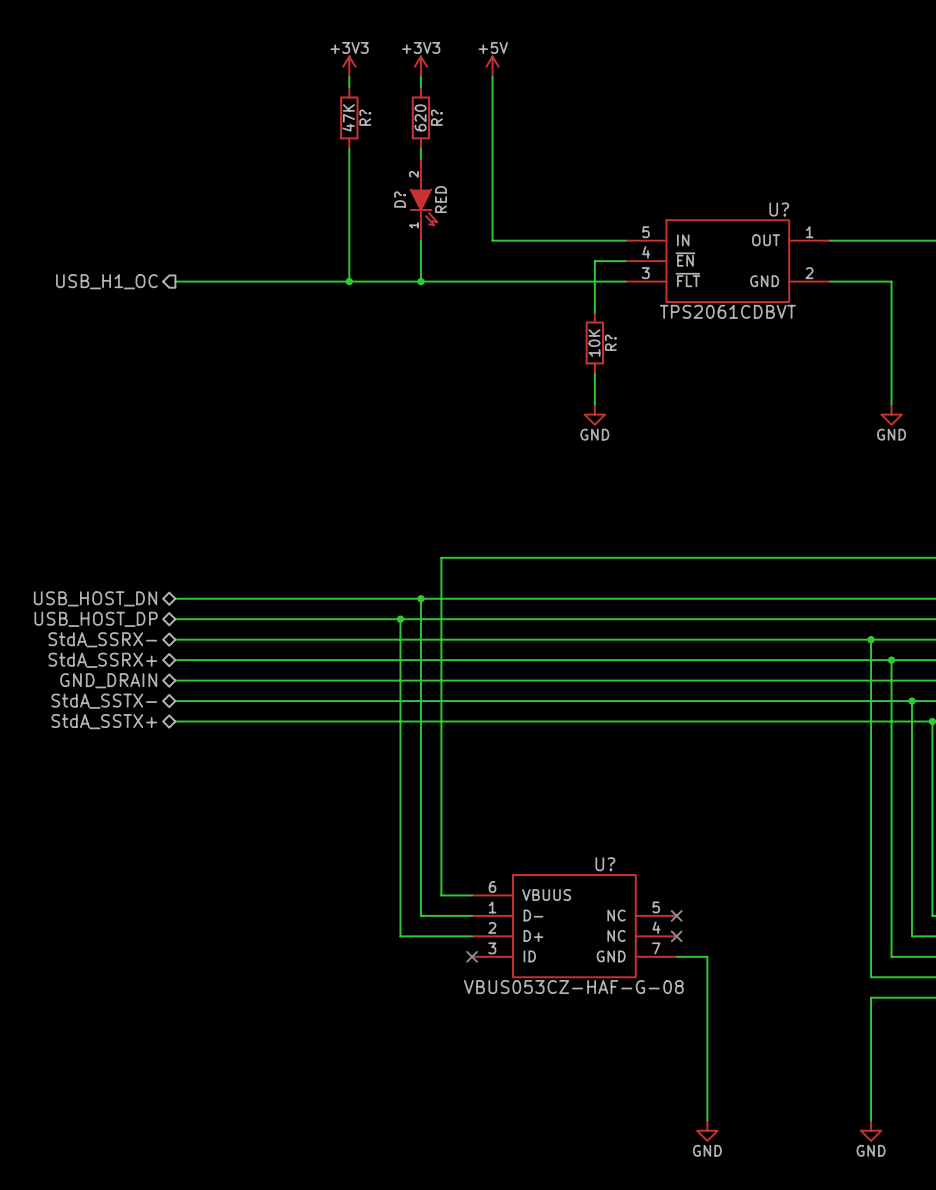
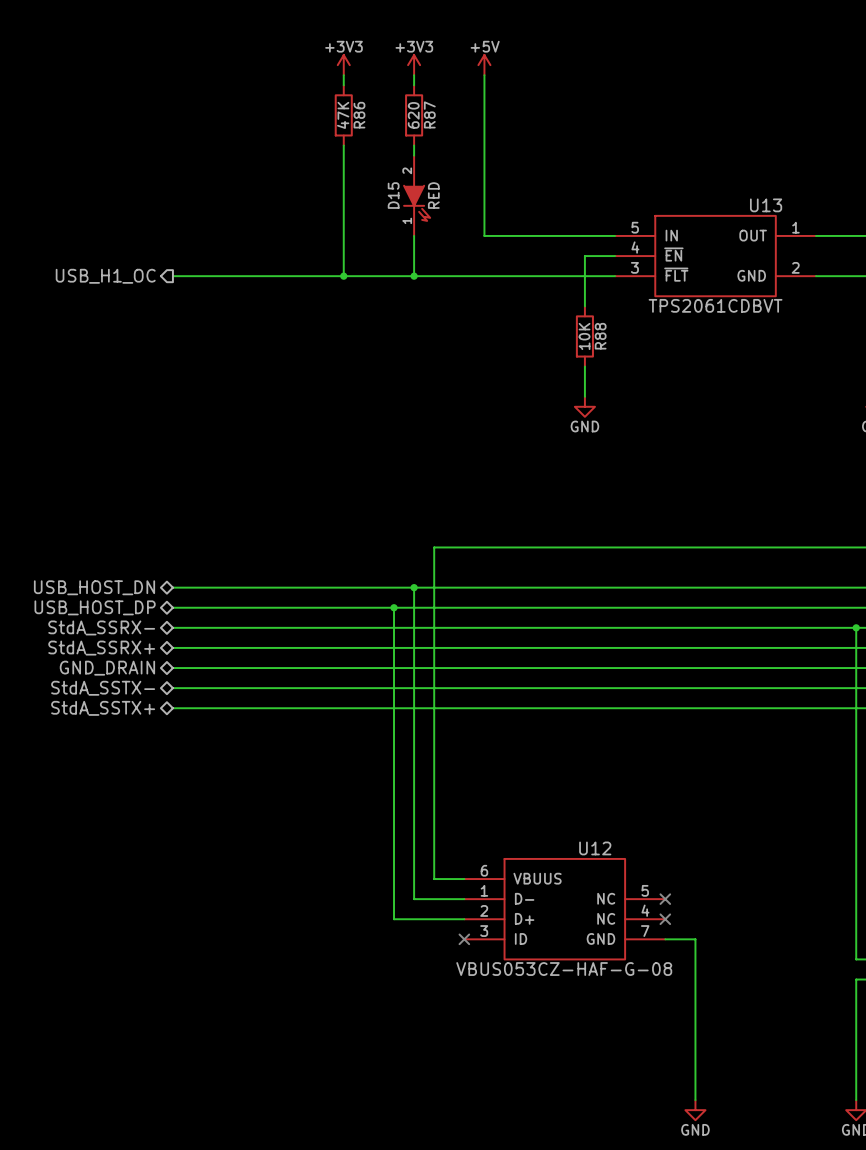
R? name: R? (365, 117) -> R86 (359, 115)
R? name: R? (436, 117) -> R87 (429, 114)
D? name: D? (400, 199) -> D15 (393, 195)
U? name: U? (779, 209) -> U13 (766, 205)
R? name: R? (610, 342) -> R88 (600, 336)
U? name: U? (605, 864) -> U12 (595, 848)

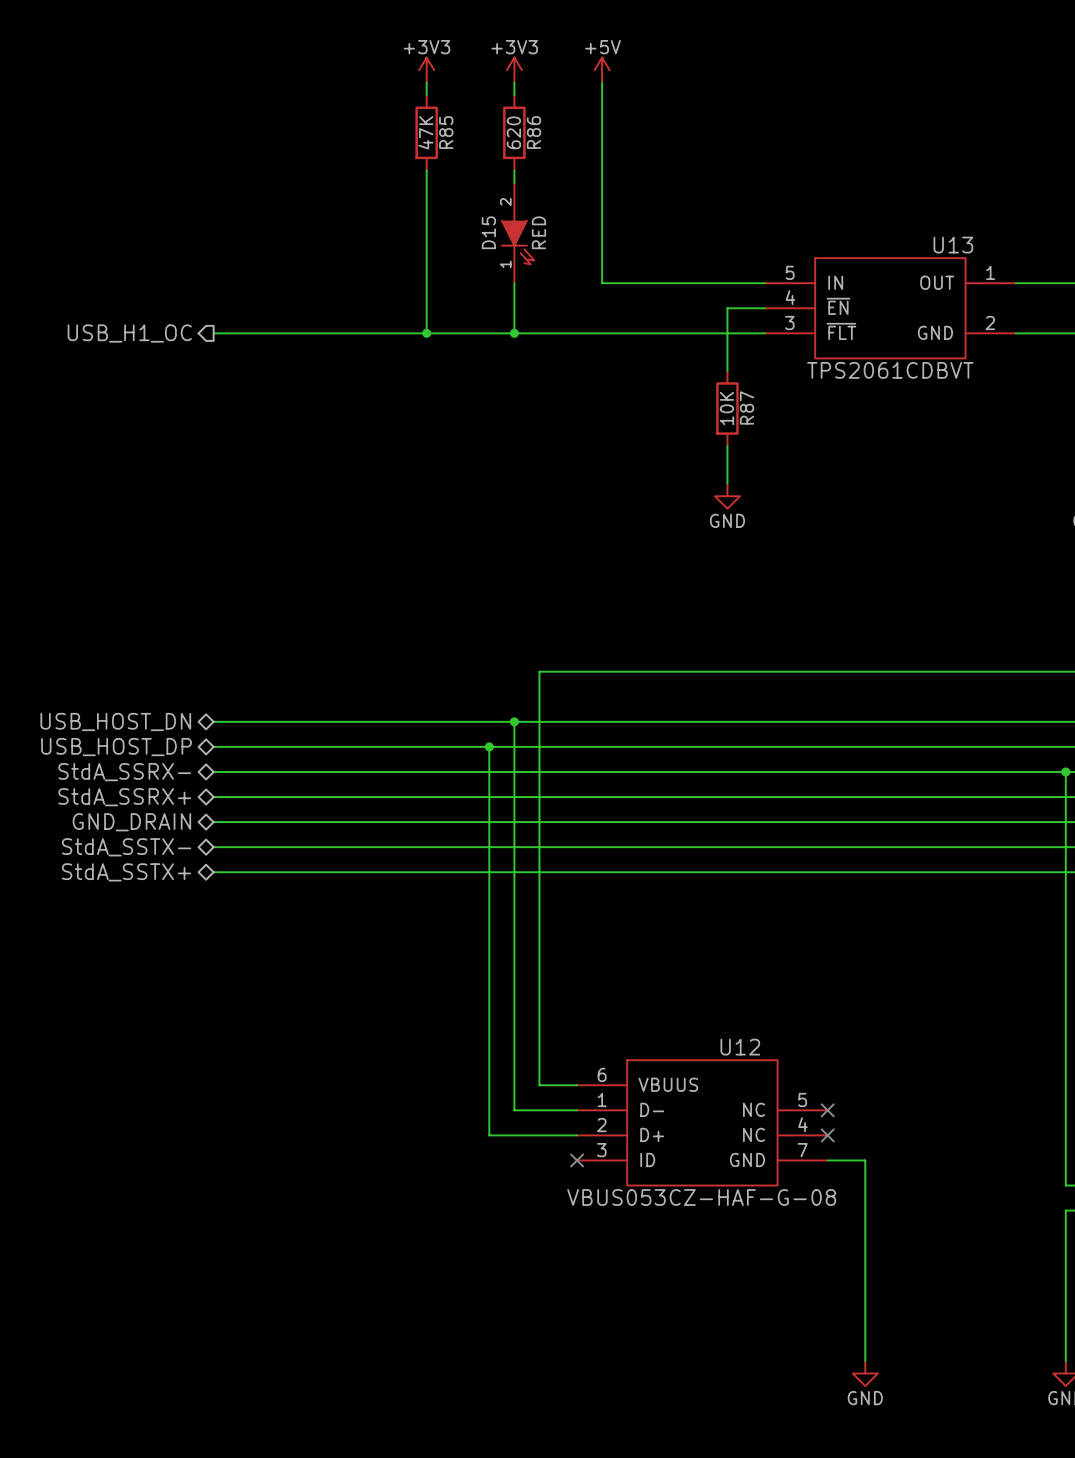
R87 name: R87 (429, 114) -> R86 (533, 132)
R86 name: R86 (359, 115) -> R85 (446, 132)
R88 name: R88 (600, 336) -> R87 (747, 407)

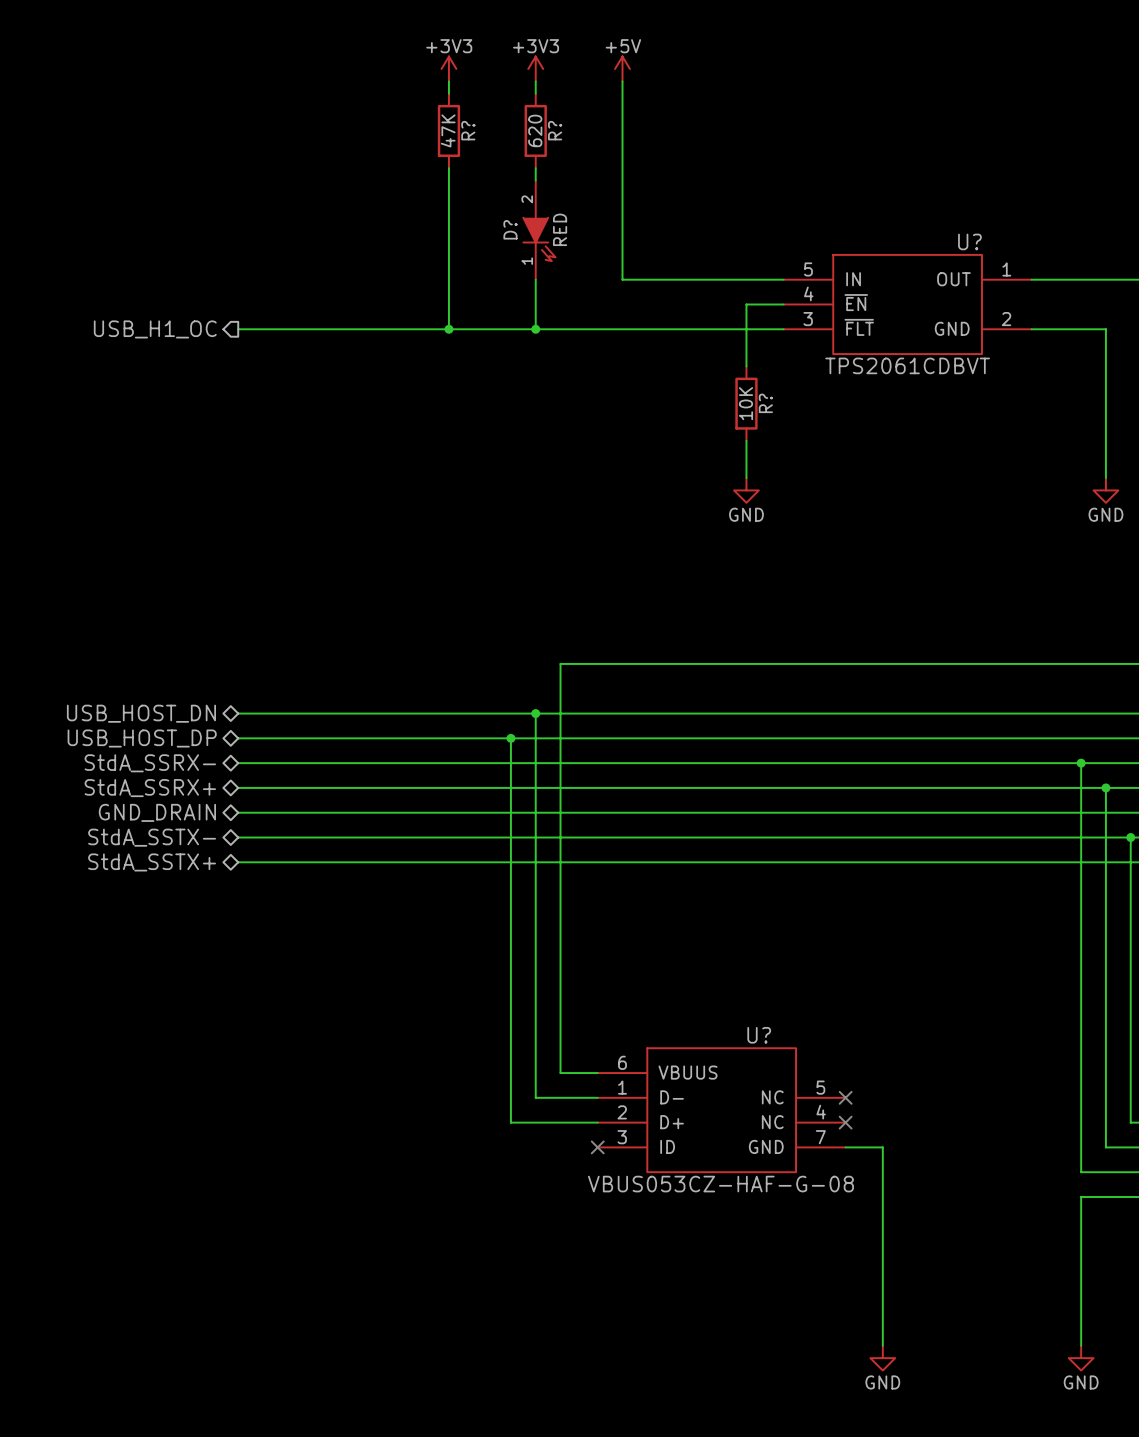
R85 name: R85 (446, 132) -> R? (468, 130)
R86 name: R86 (533, 132) -> R? (555, 130)
D15 name: D15 (488, 232) -> D? (510, 229)
U13 name: U13 (953, 245) -> U? (969, 241)
R87 name: R87 (747, 407) -> R? (765, 403)
U12 name: U12 (740, 1047) -> U? (759, 1035)

